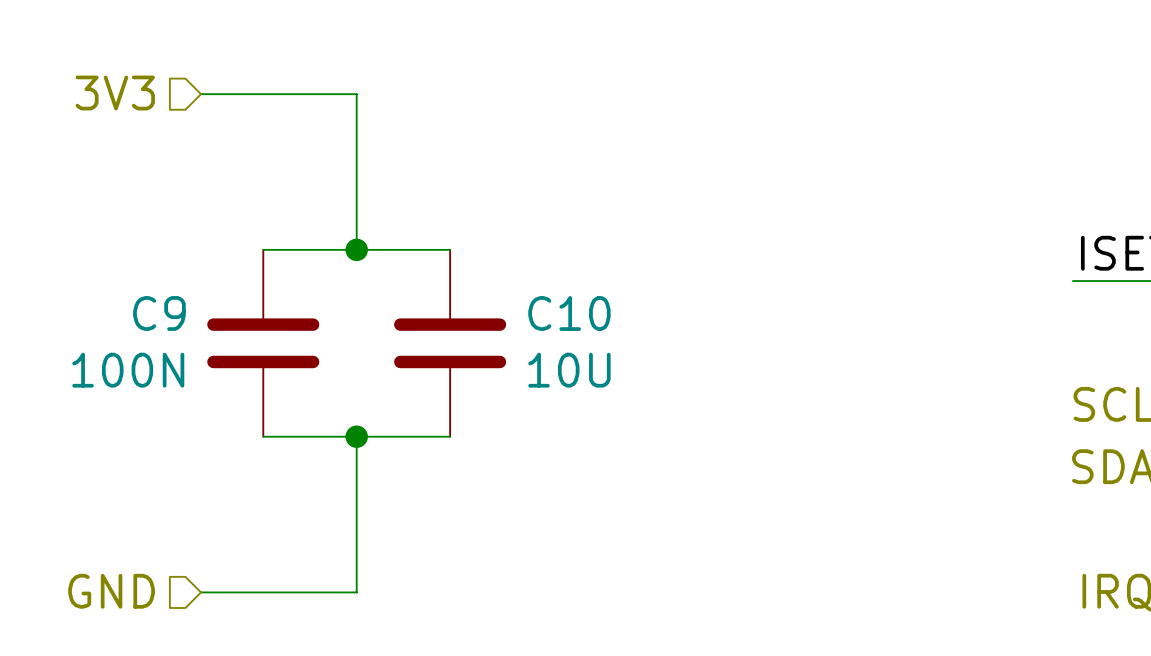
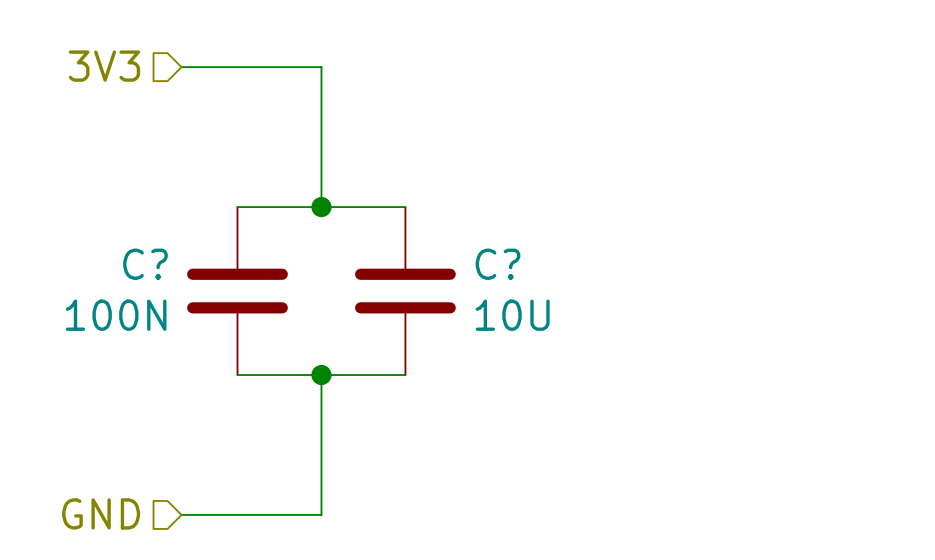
C9 name: C9 (159, 313) -> C? (145, 264)
C10 name: C10 (569, 313) -> C? (498, 264)

